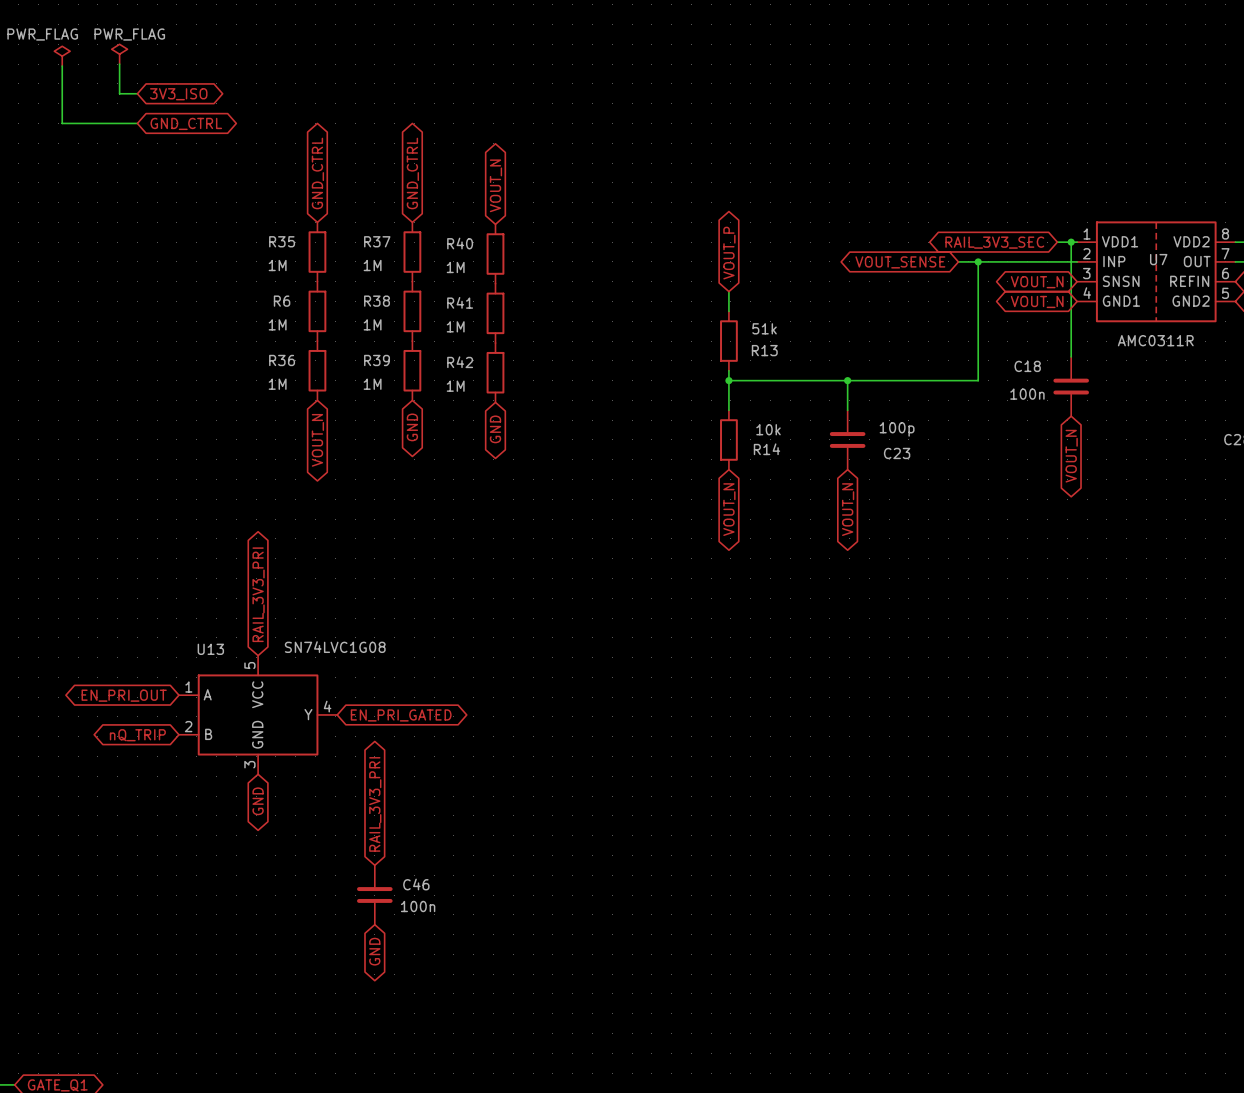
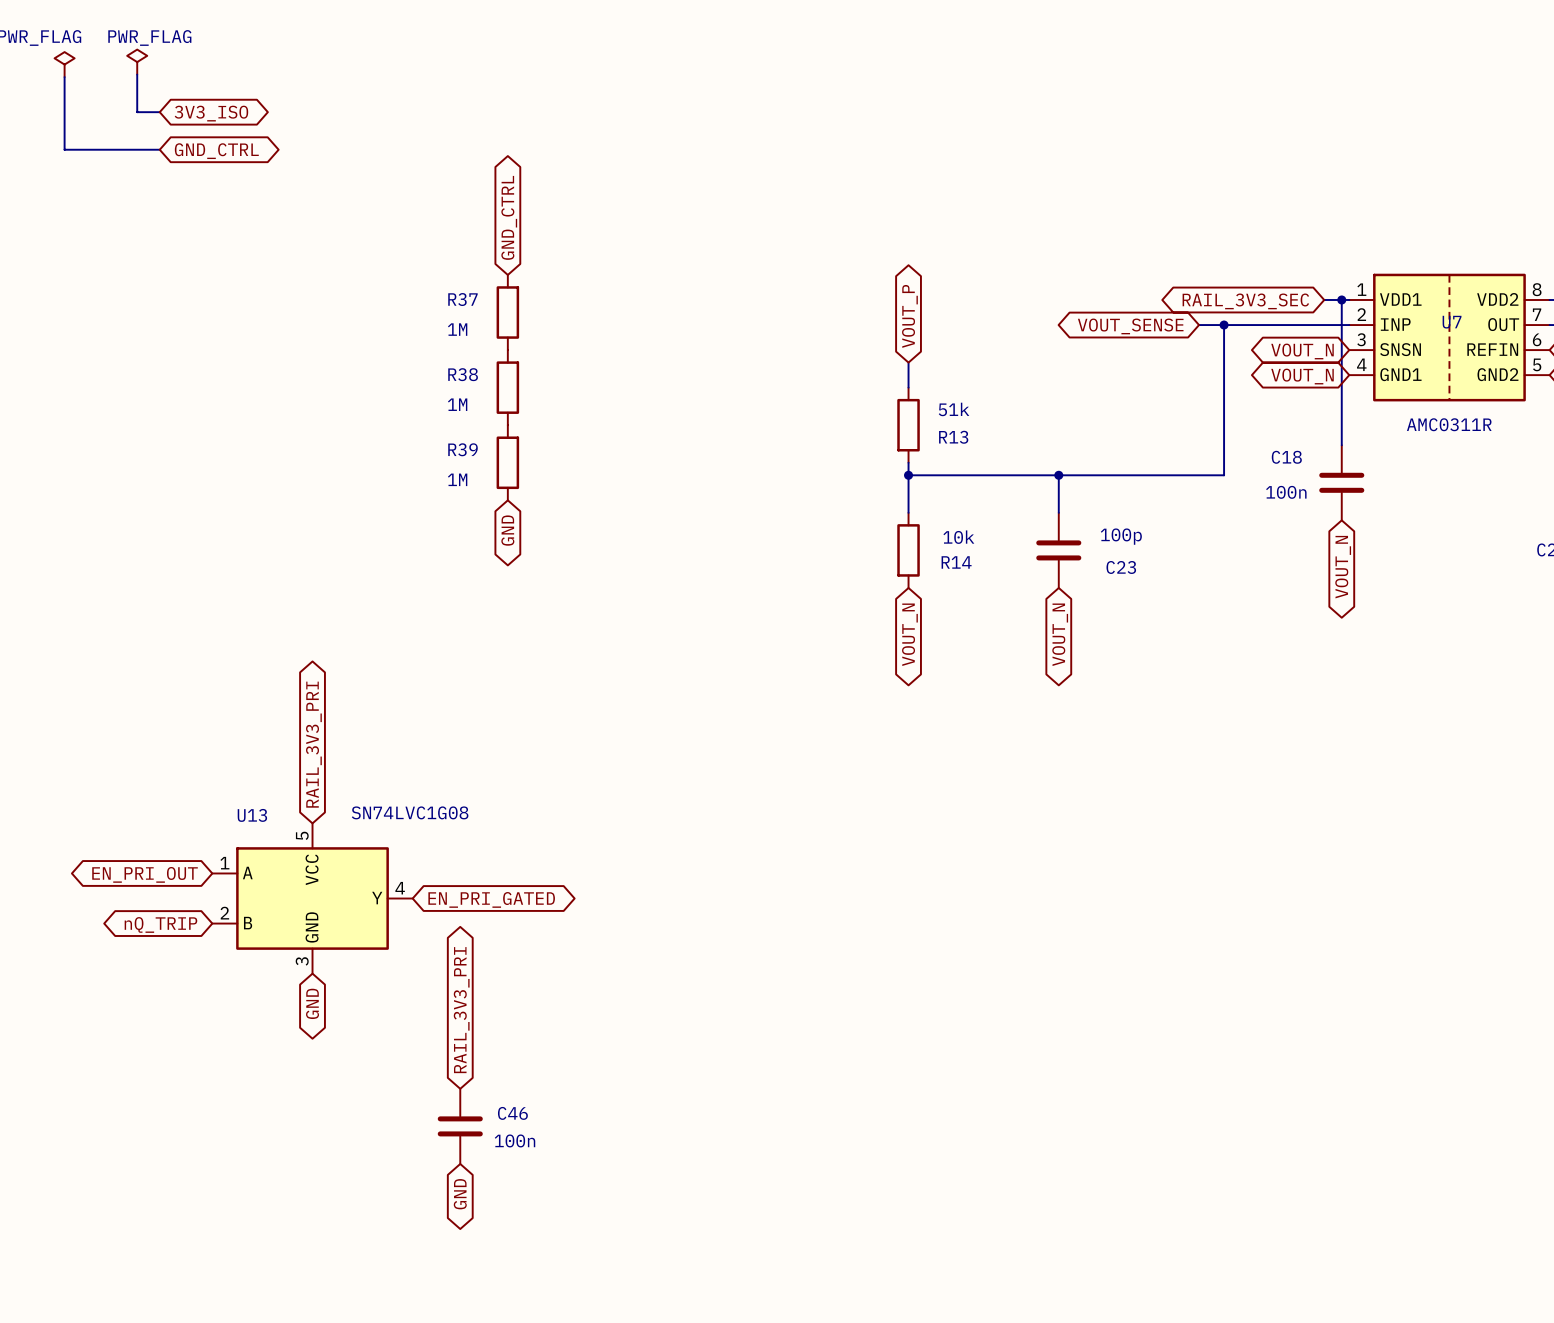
global label: GND_CTRL (317, 173) -> none
global label: VOUT_N (495, 185) -> none
R35: 1M (317, 252) -> none
R40: 1M (495, 254) -> none
R6: 1M (317, 311) -> none
R41: 1M (495, 313) -> none
R36: 1M (317, 370) -> none
R42: 1M (495, 372) -> none
global label: GND (495, 429) -> none
global label: VOUT_N (317, 440) -> none

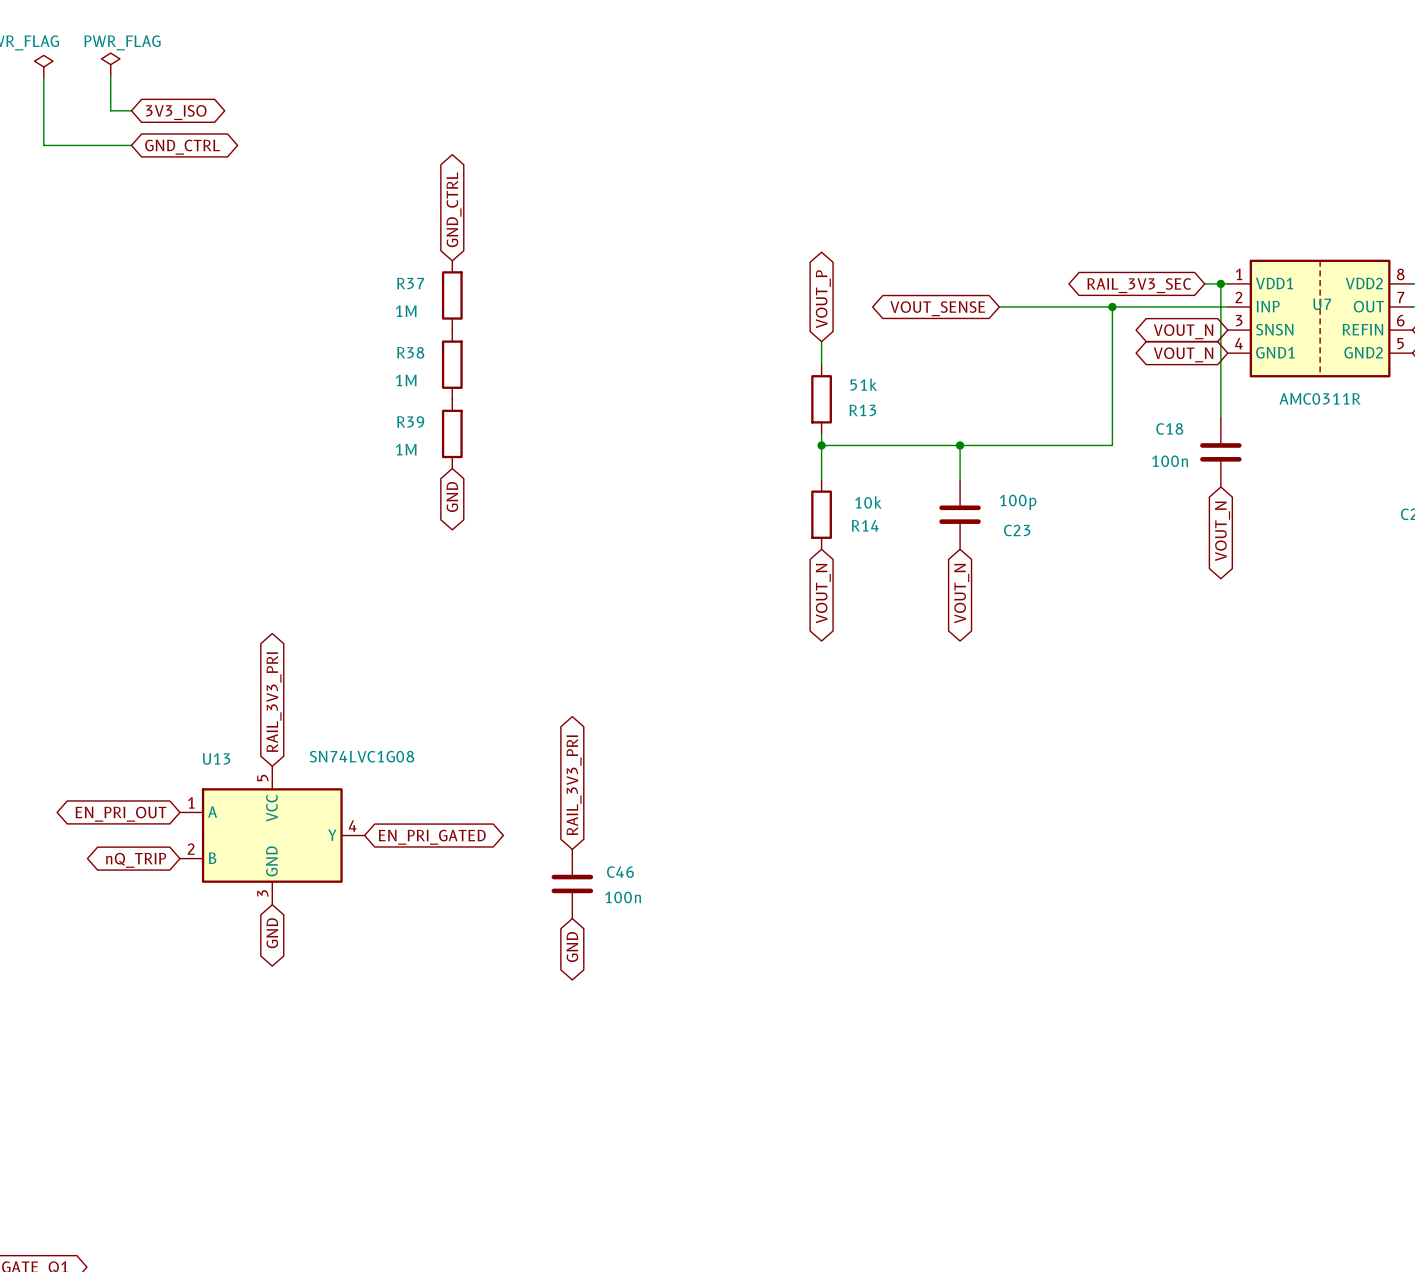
wire: none -> (999, 307) (1089, 307)
global label position: VOUT_SENSE (1130, 326) -> VOUT_SENSE (937, 308)
global label: none -> RAIL_3V3_PRI (574, 785)
global label: RAIL_3V3_PRI (461, 1010) -> none
global label: none -> GND (572, 947)
C46 position: (460, 1126) -> (572, 883)
global label: GND (460, 1194) -> none

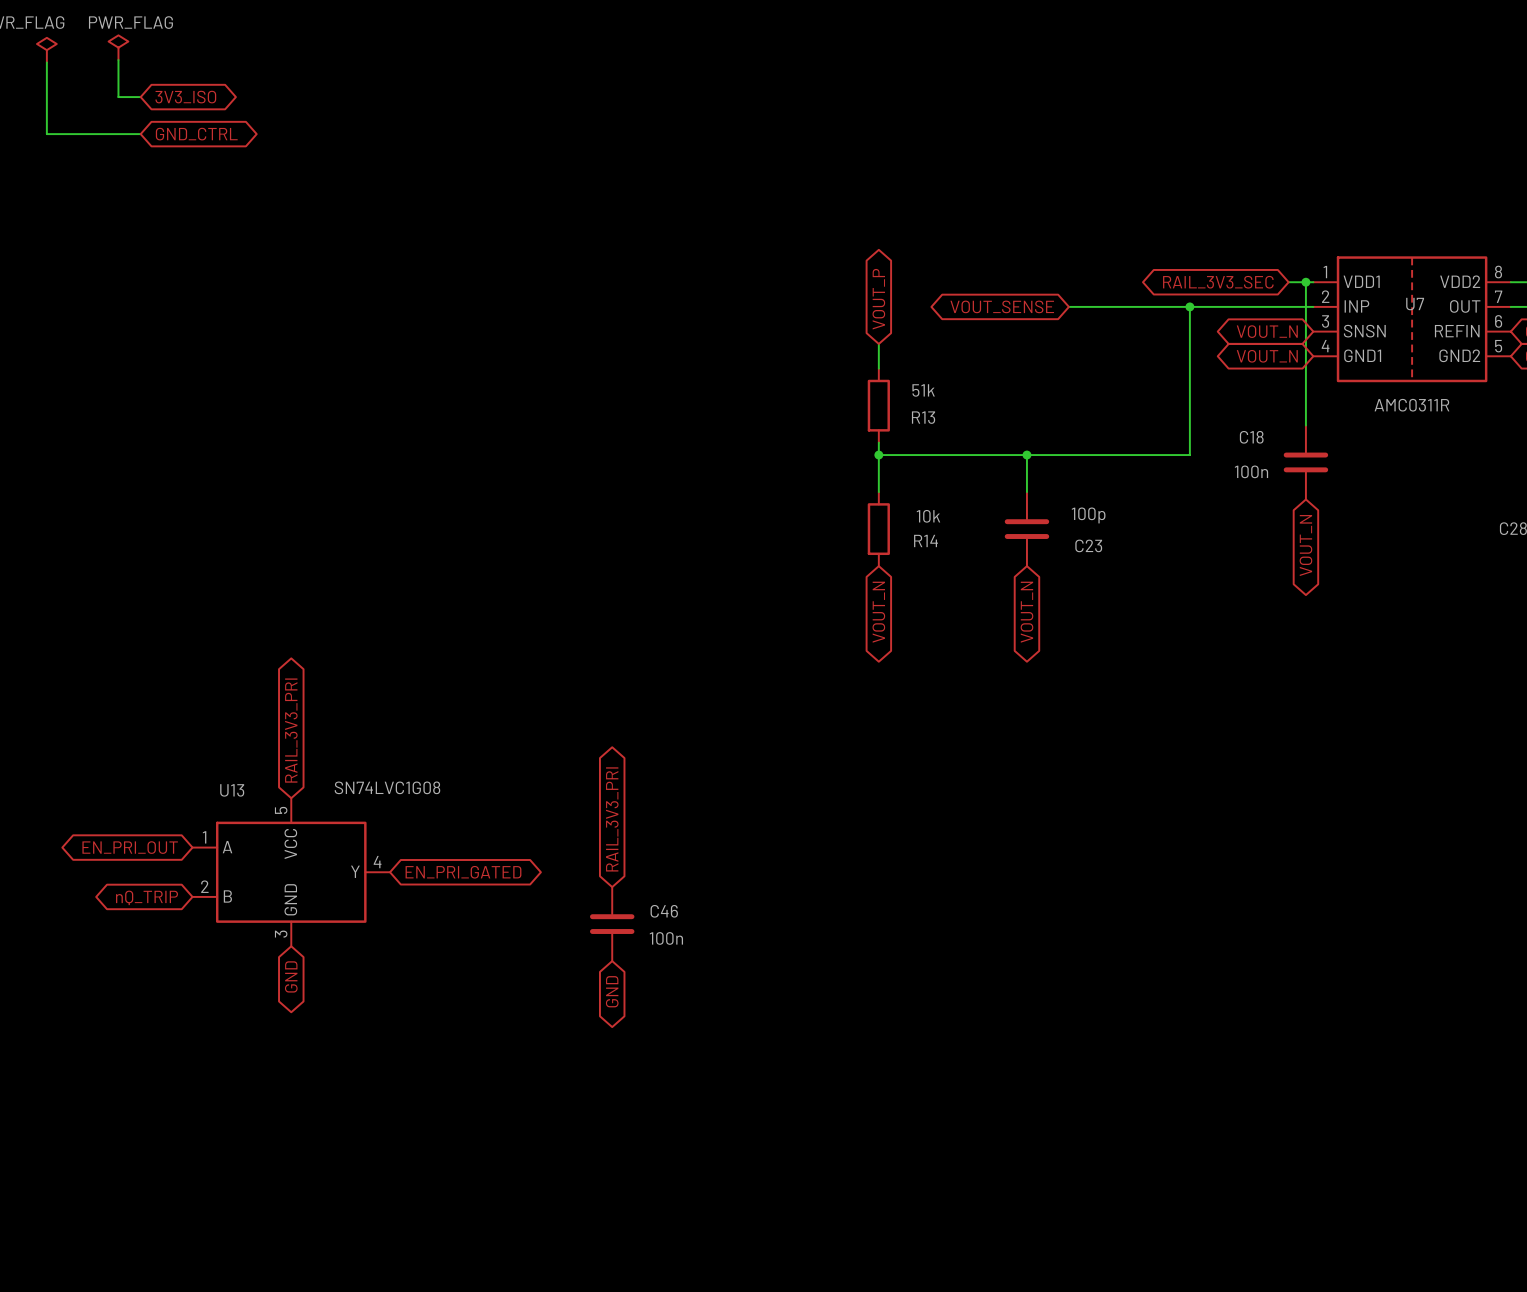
global label: GND_CTRL (454, 209) -> none
R37: 1M (452, 295) -> none
R38: 1M (452, 364) -> none
R39: 1M (452, 433) -> none
global label: GND (452, 496) -> none

